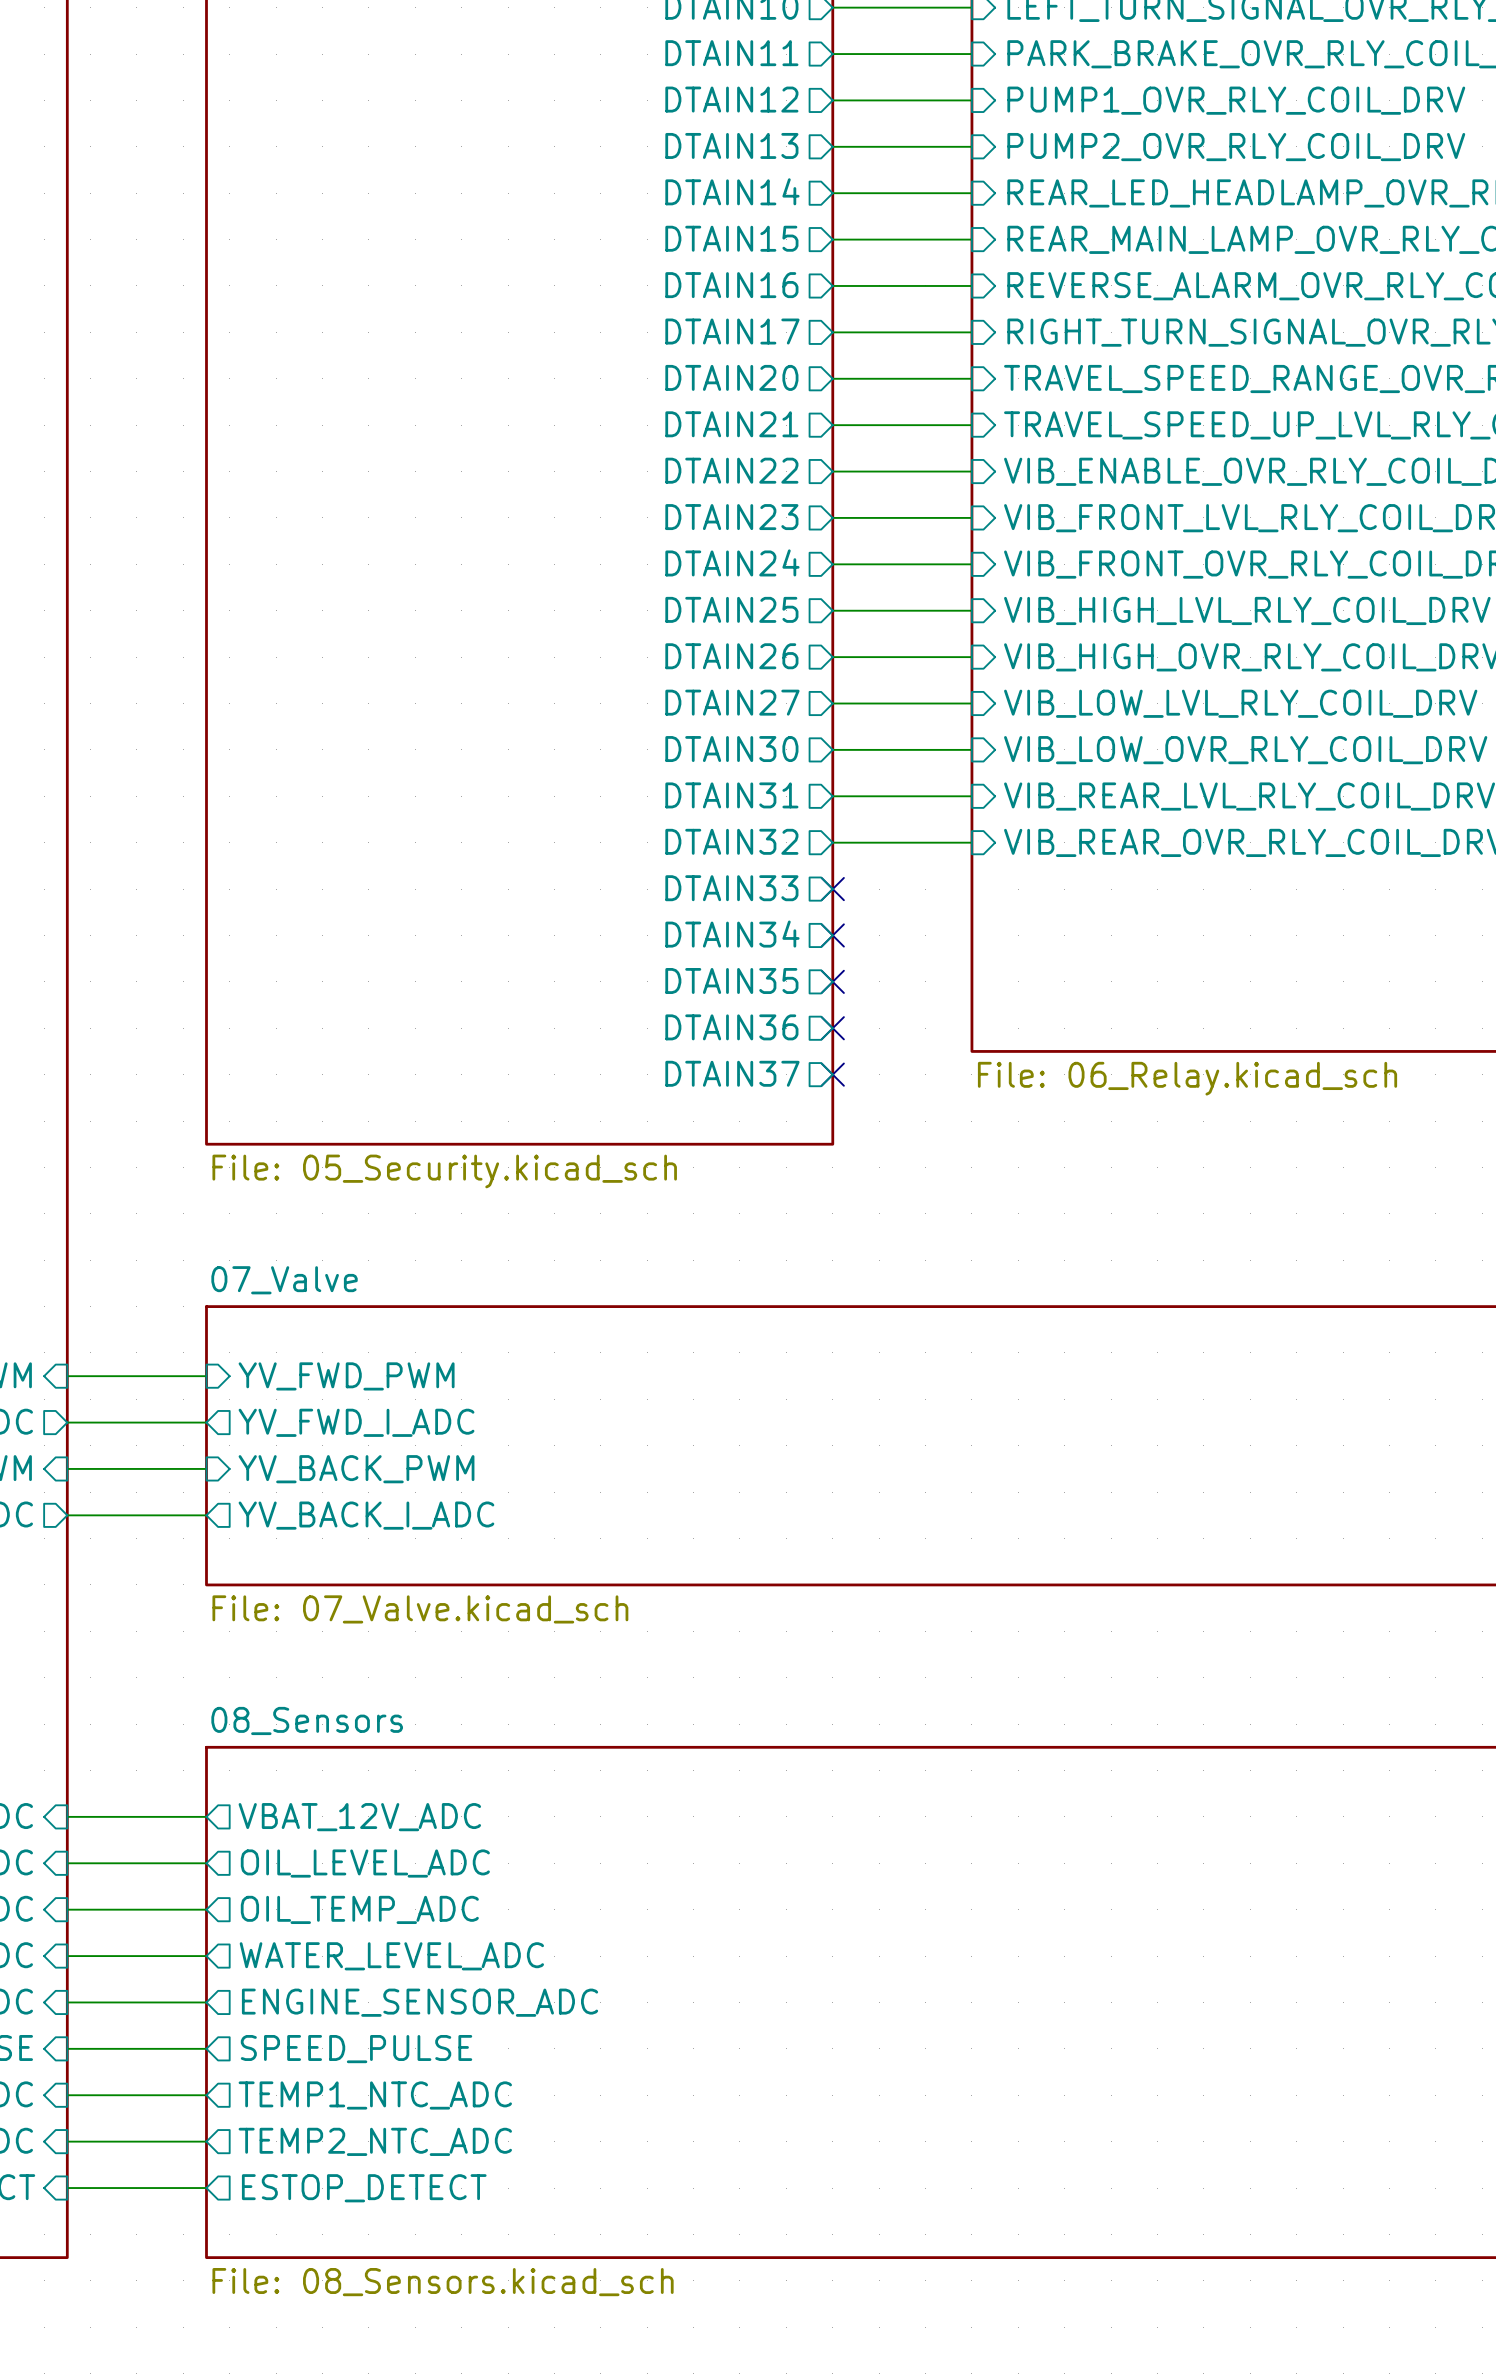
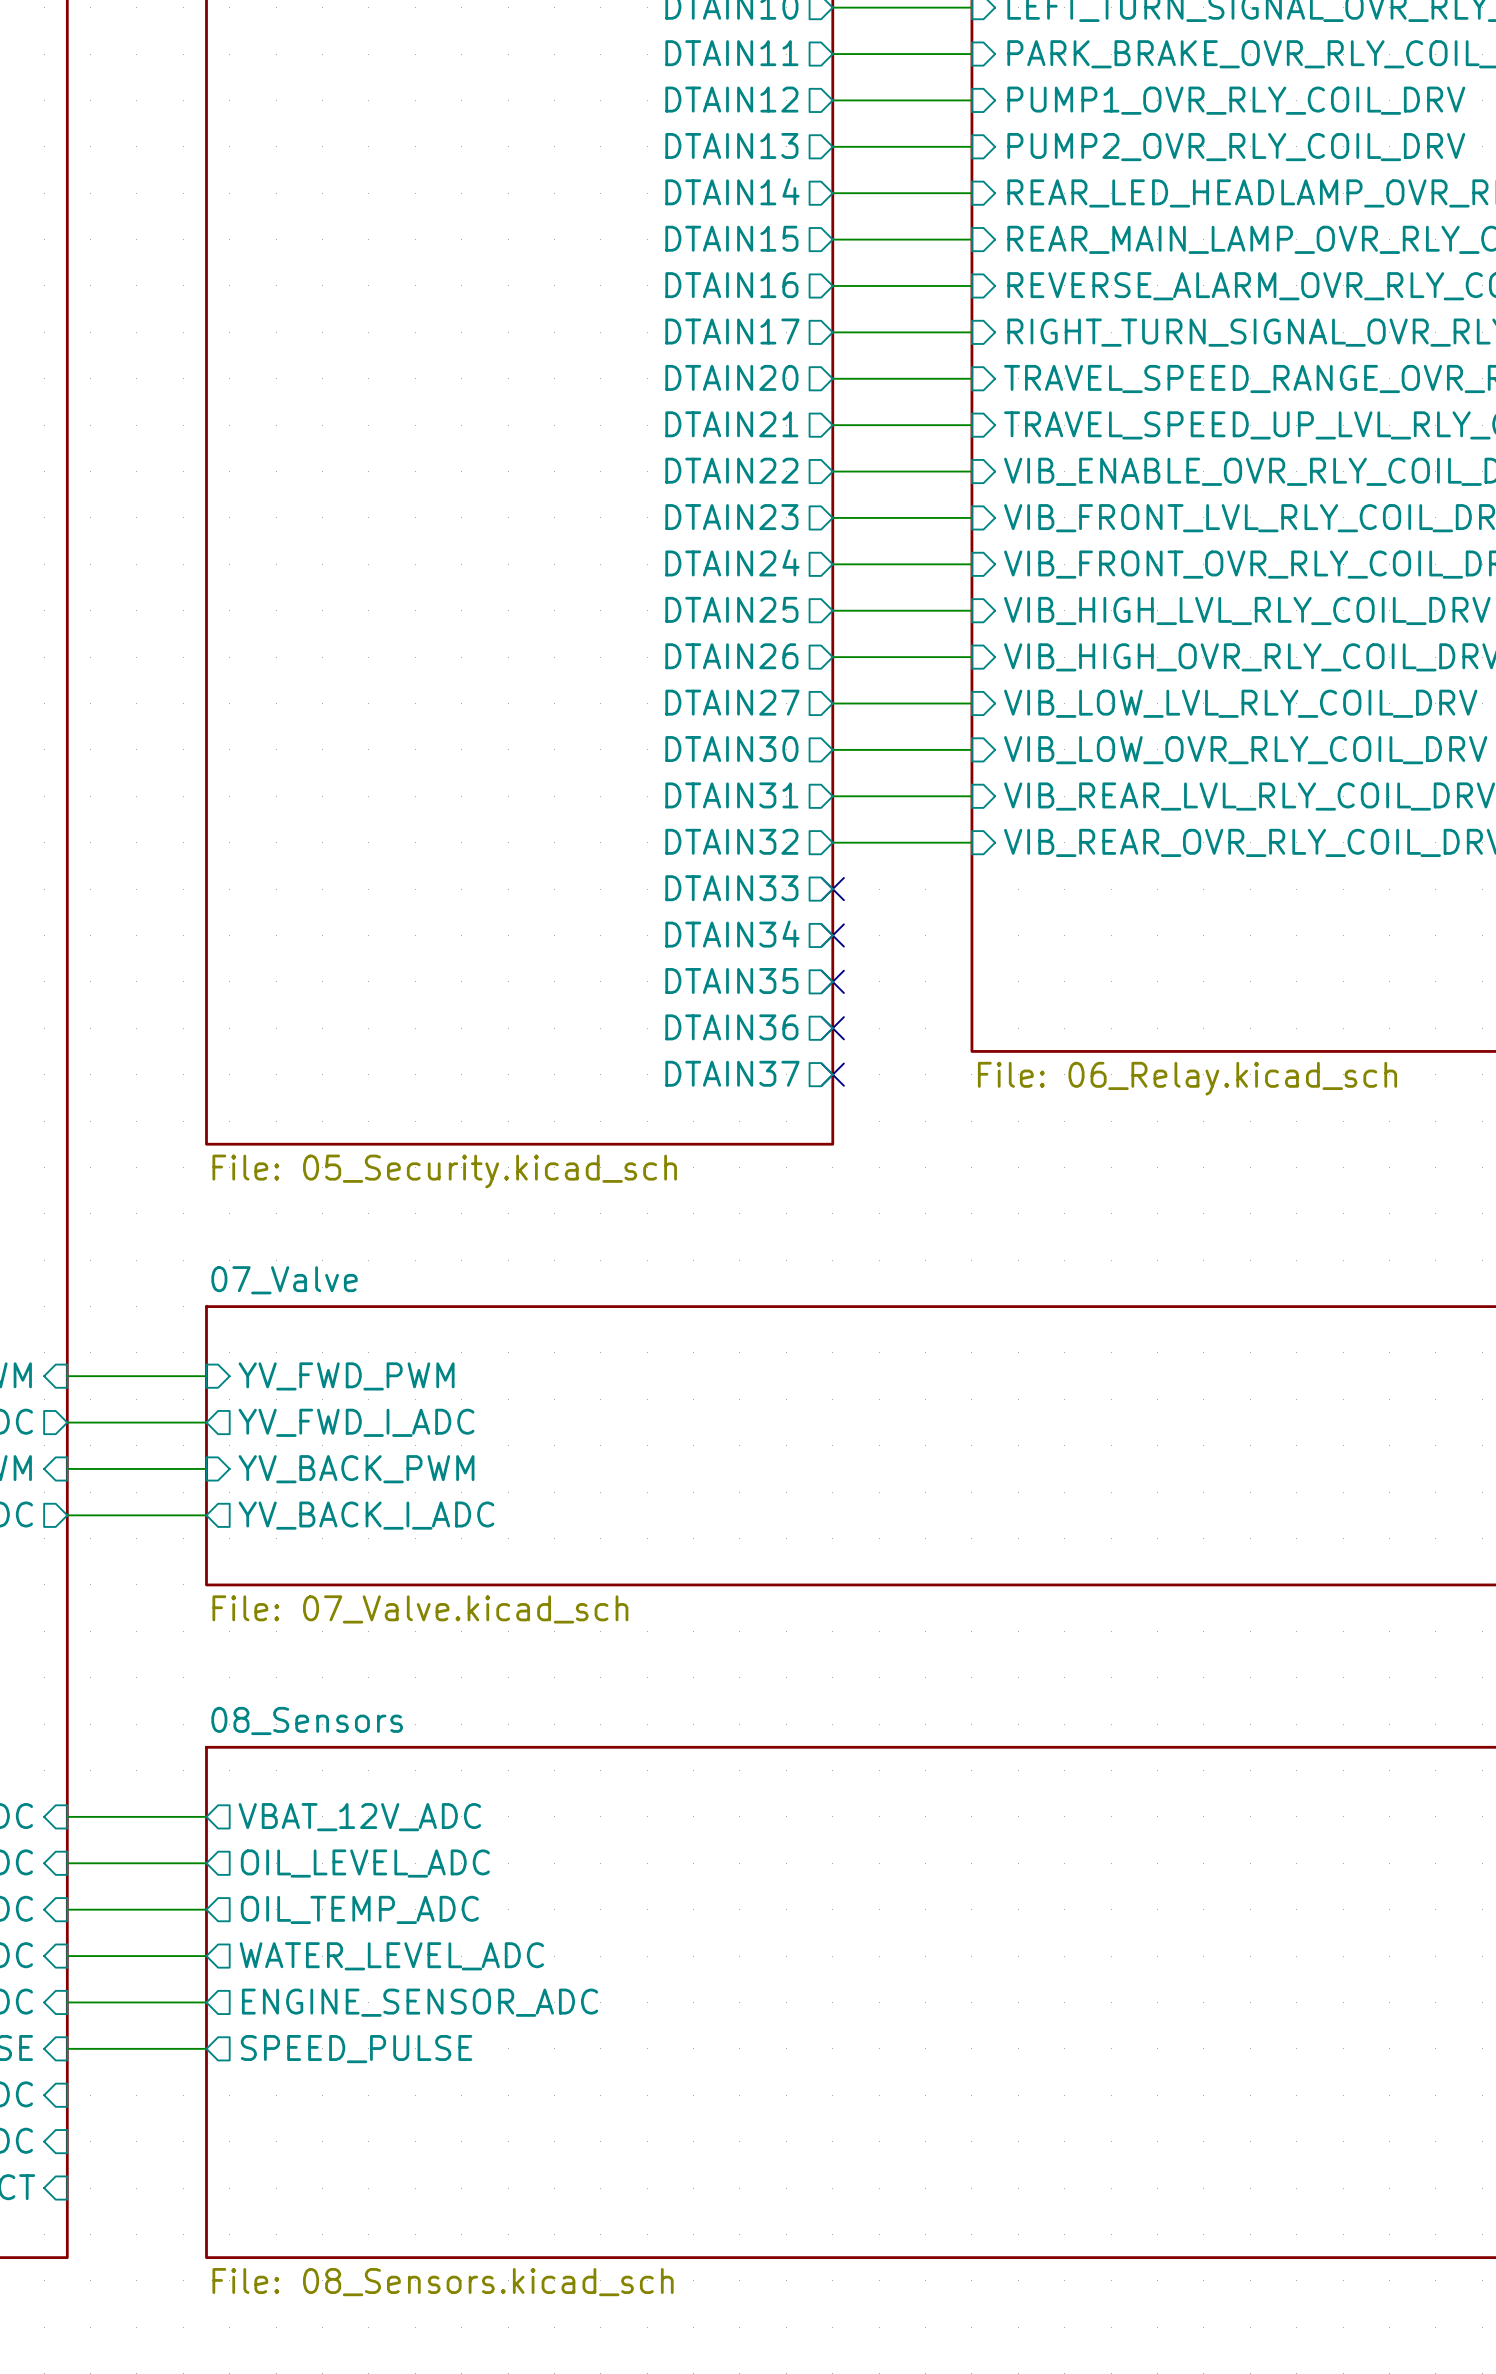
wire: (67, 2095) (206, 2095) -> none
sheet pin: TEMP1_NTC_ADC (375, 2095) -> none
wire: (67, 2141) (206, 2141) -> none
sheet pin: TEMP2_NTC_ADC (375, 2141) -> none
wire: (67, 2188) (206, 2188) -> none
sheet pin: ESTOP_DETECT (364, 2188) -> none

